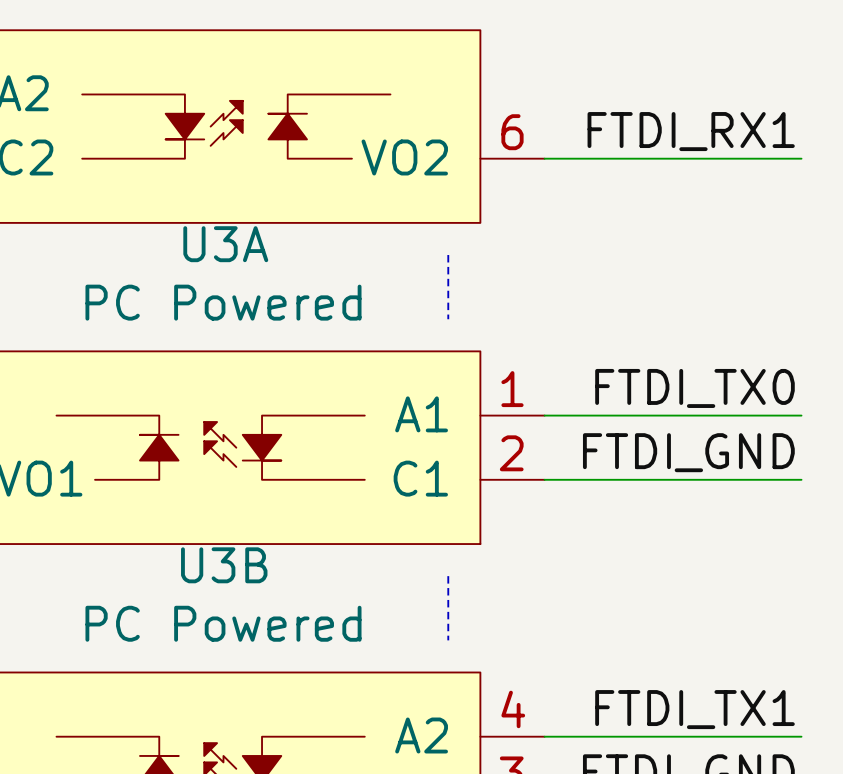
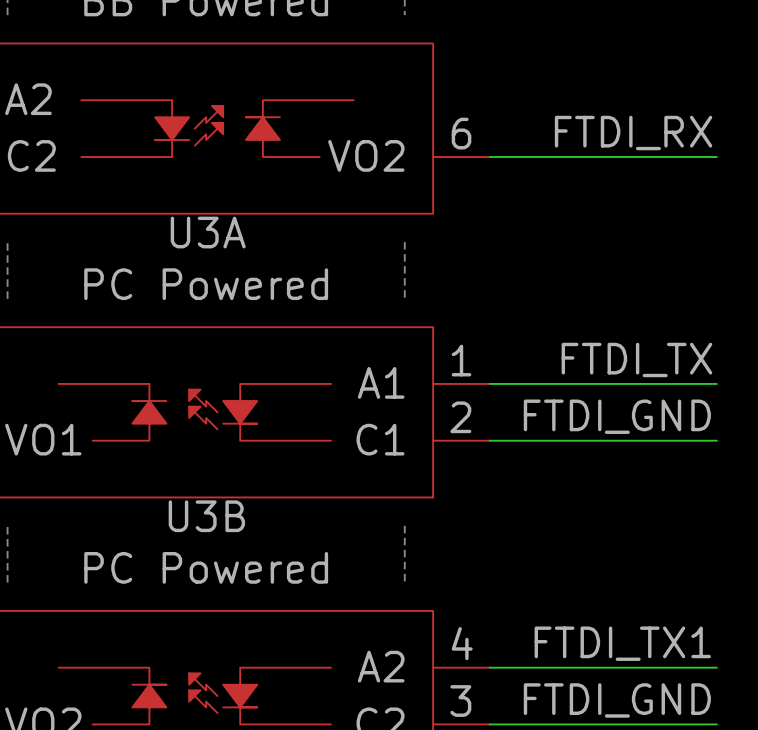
label: FTDI_RX1 (691, 131) -> FTDI_RX (633, 133)
label: FTDI_TX0 (694, 388) -> FTDI_TX (636, 359)

